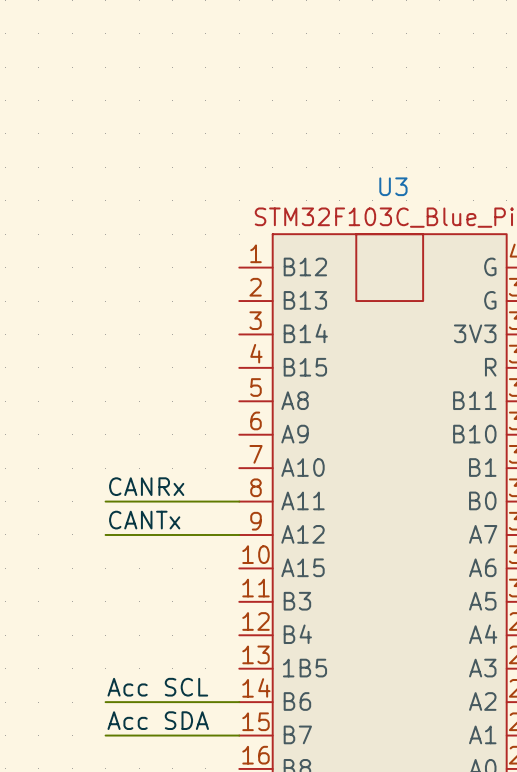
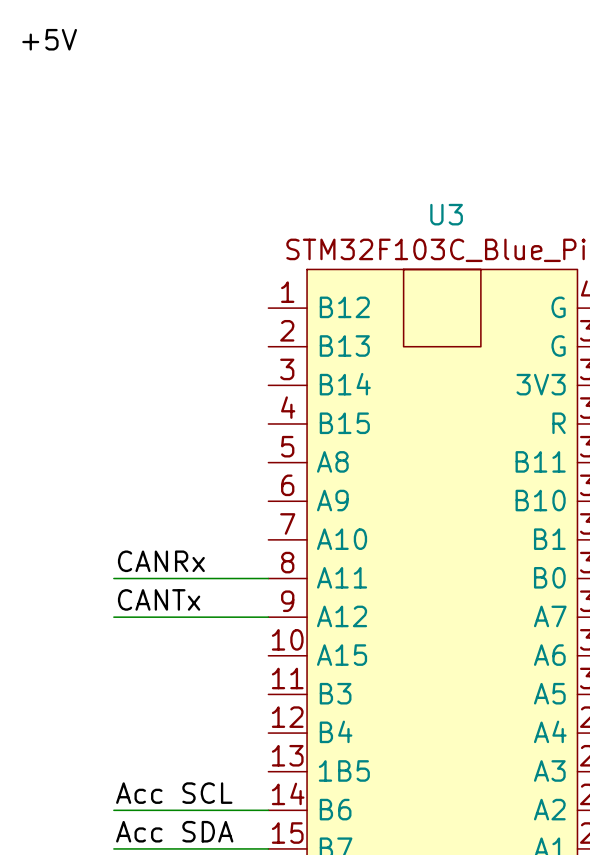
label: none -> +5V (49, 39)

